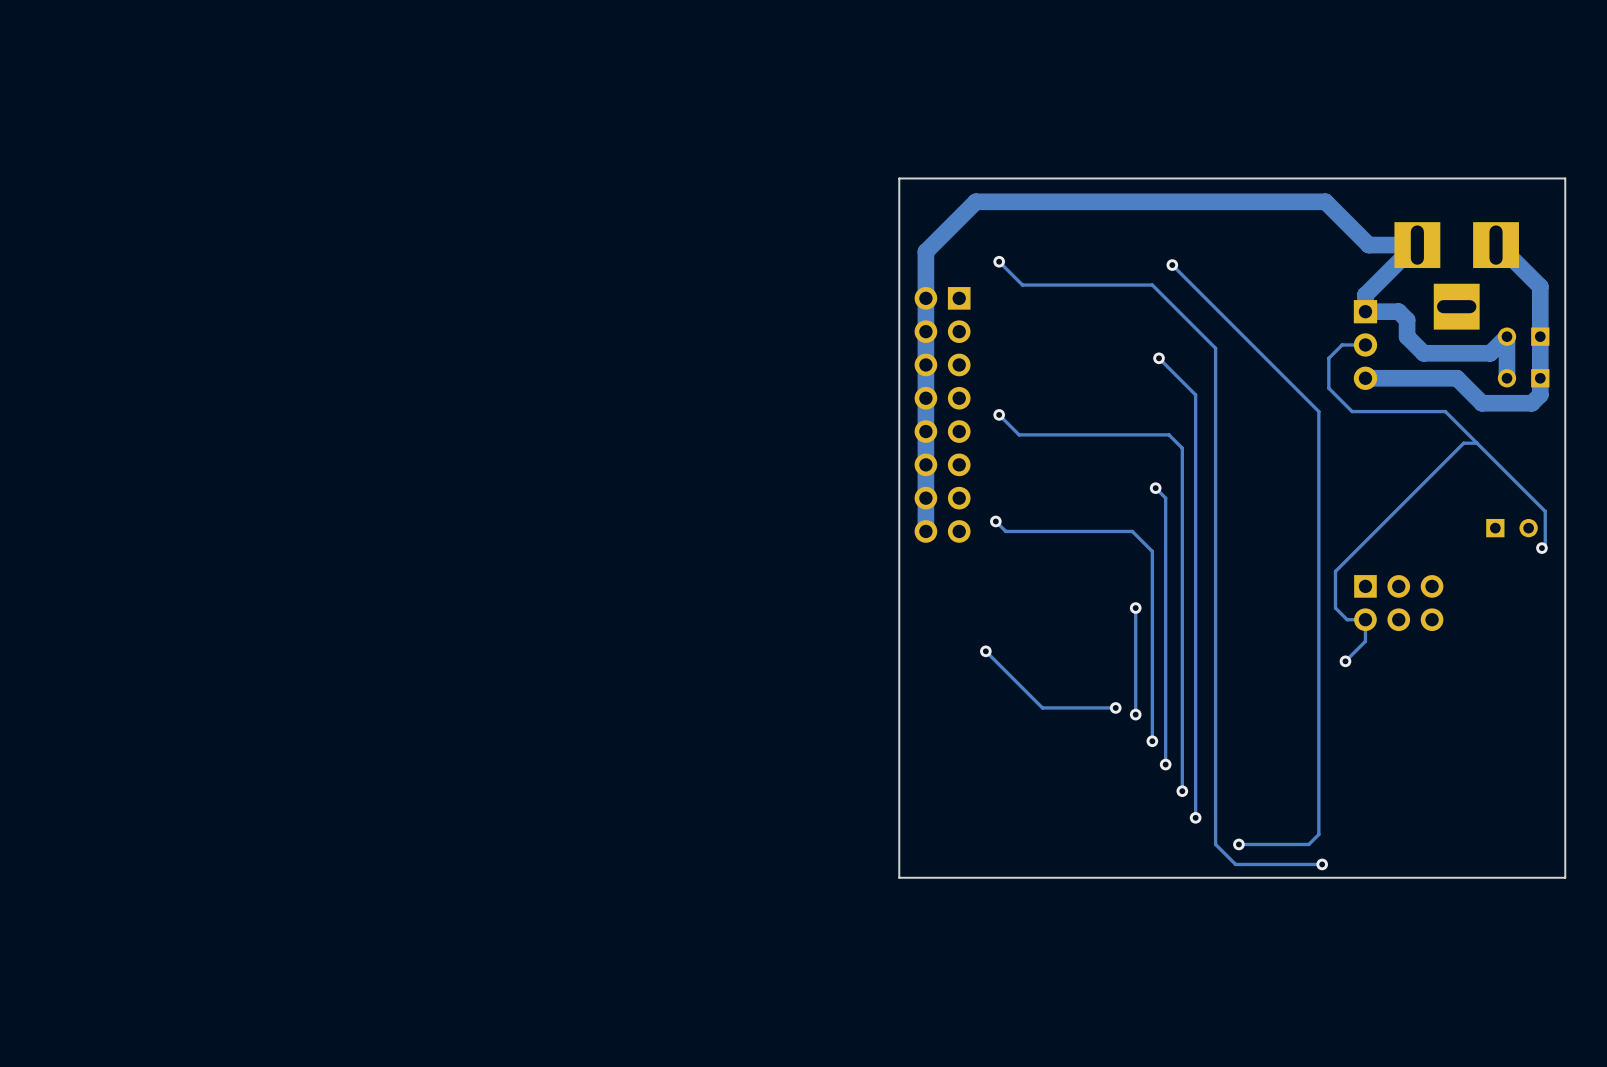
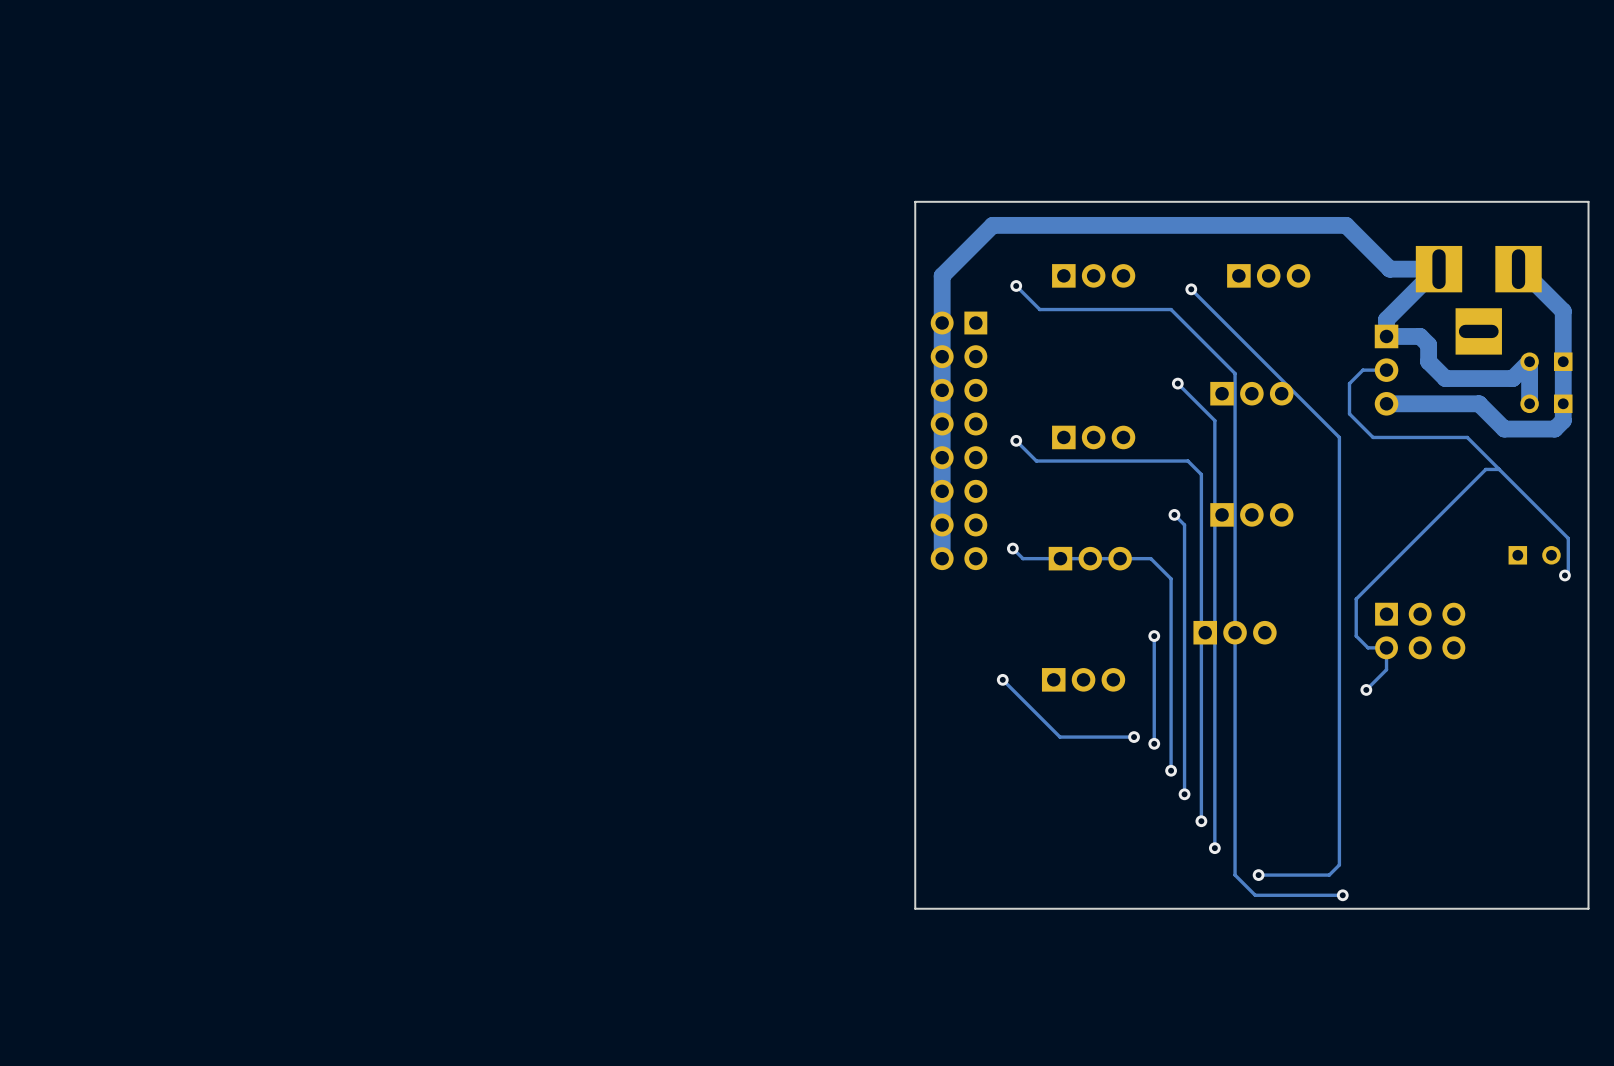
part: none -> (1093, 275)
part: none -> (1268, 275)
part: none -> (1251, 393)
part: none -> (1093, 437)
part: none -> (1251, 514)
part: none -> (1090, 558)
part: none -> (1235, 632)
part: none -> (1083, 679)

